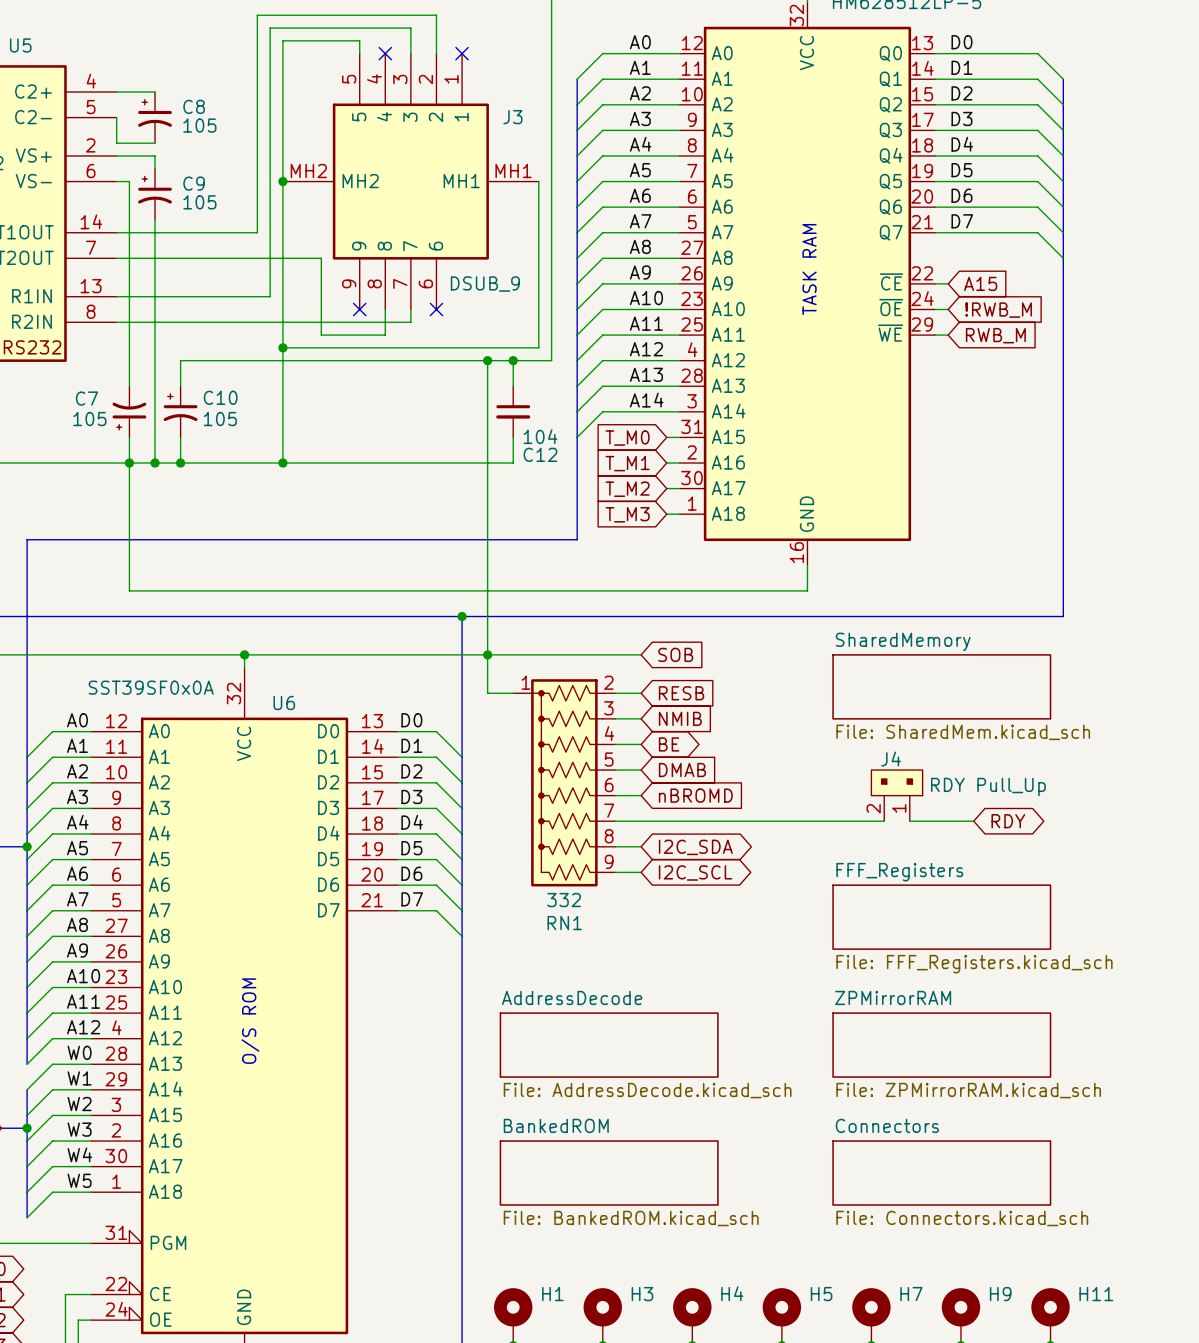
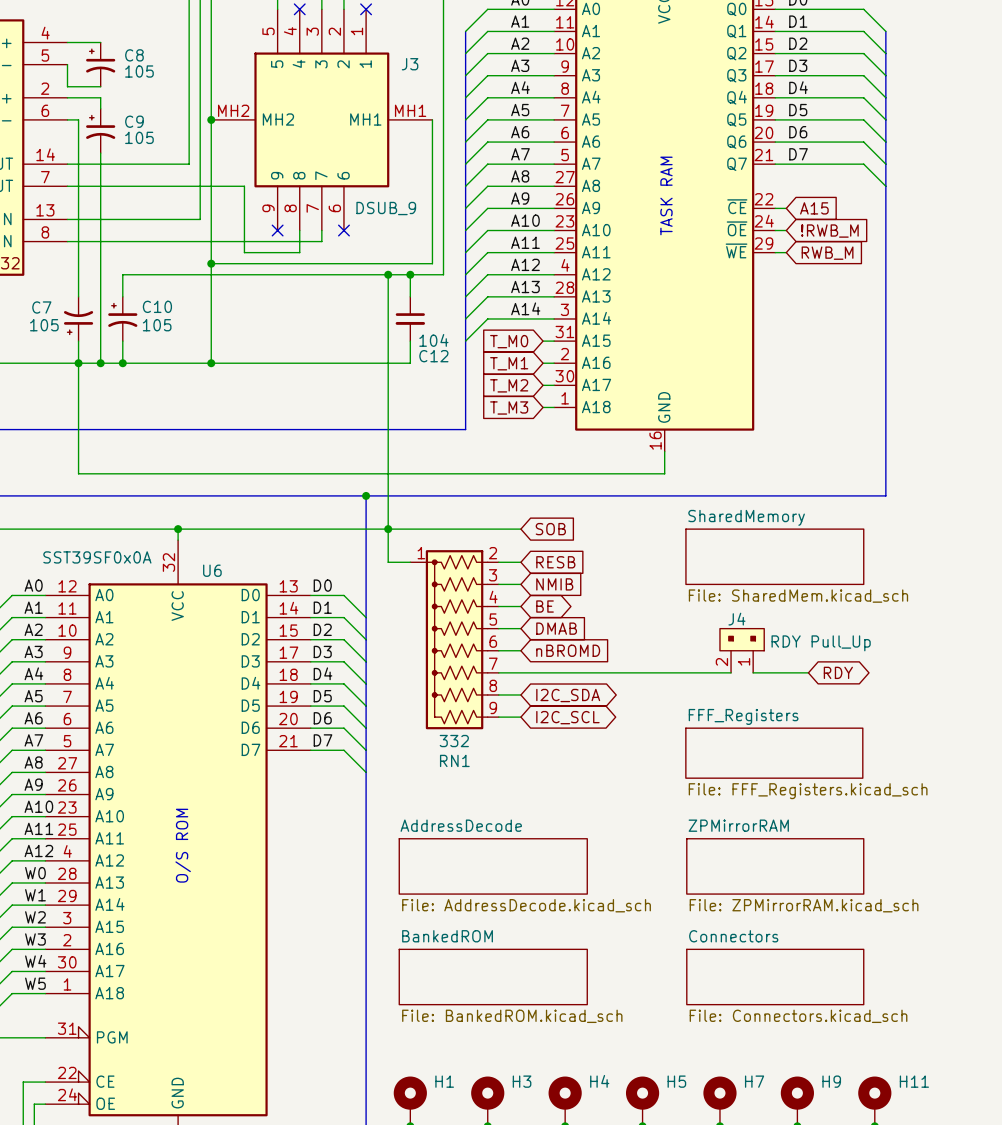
sheet SharedMemory shape: [832, 654, 1052, 720] -> [685, 528, 865, 586]
sheet FFF_Registers shape: [832, 884, 1052, 950] -> [685, 727, 864, 779]
sheet ZPMirrorRAM shape: [832, 1012, 1052, 1078] -> [686, 838, 865, 895]
sheet Connectors shape: [832, 1140, 1052, 1206] -> [686, 948, 865, 1006]

